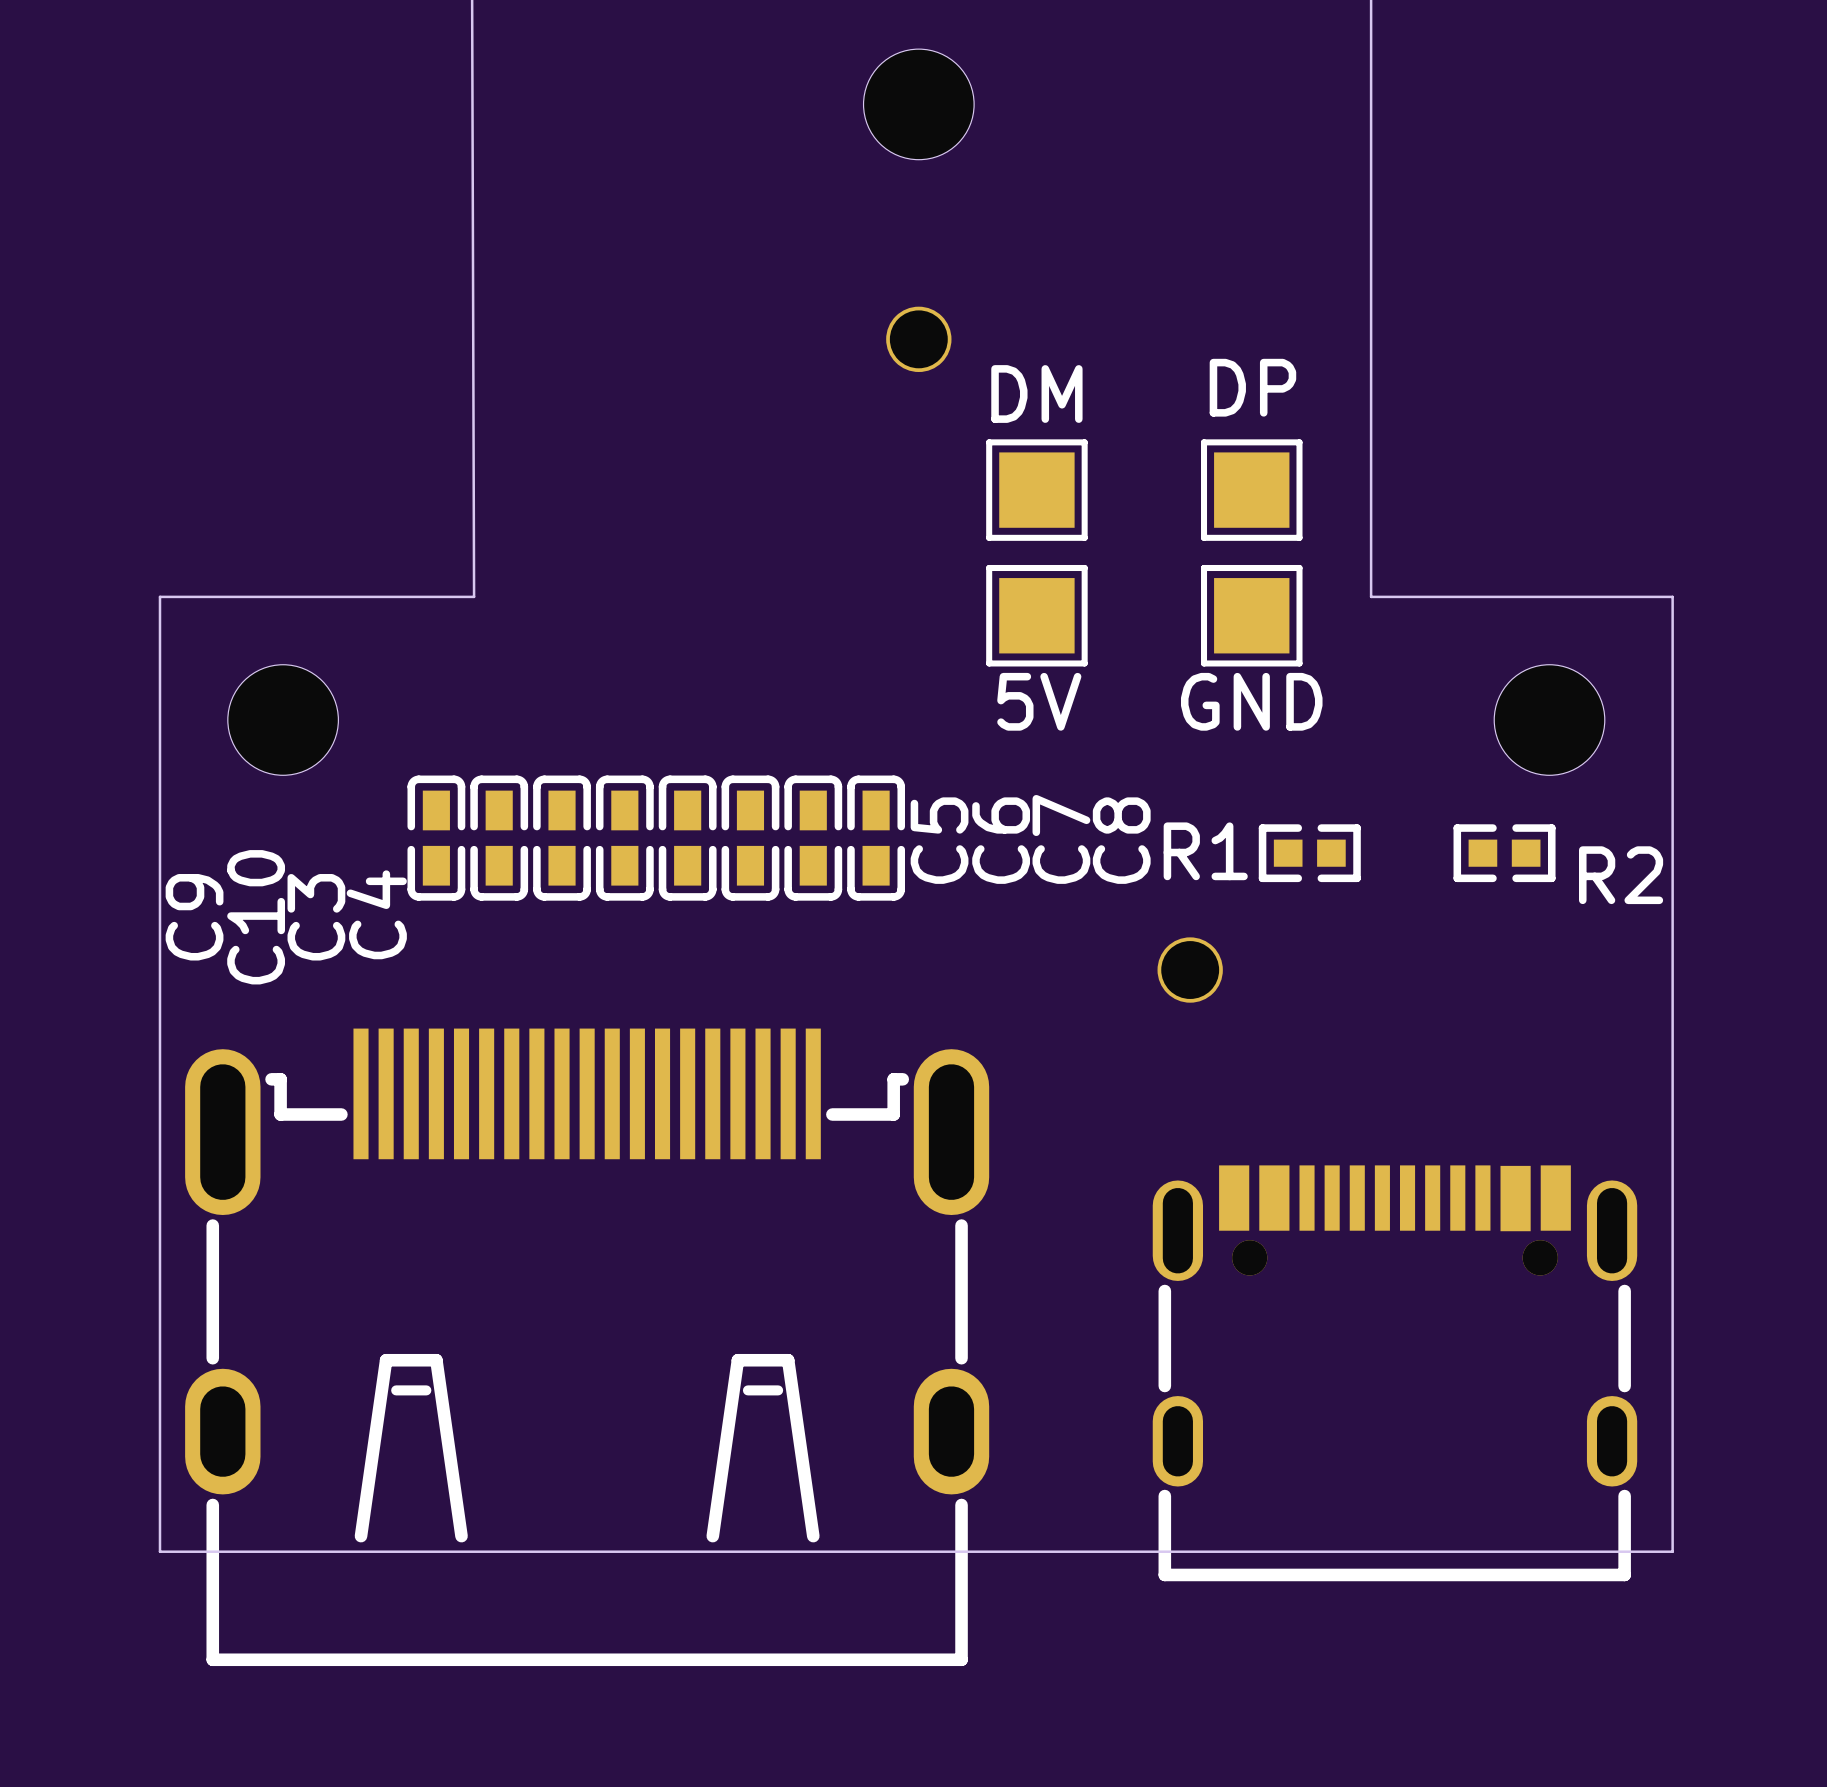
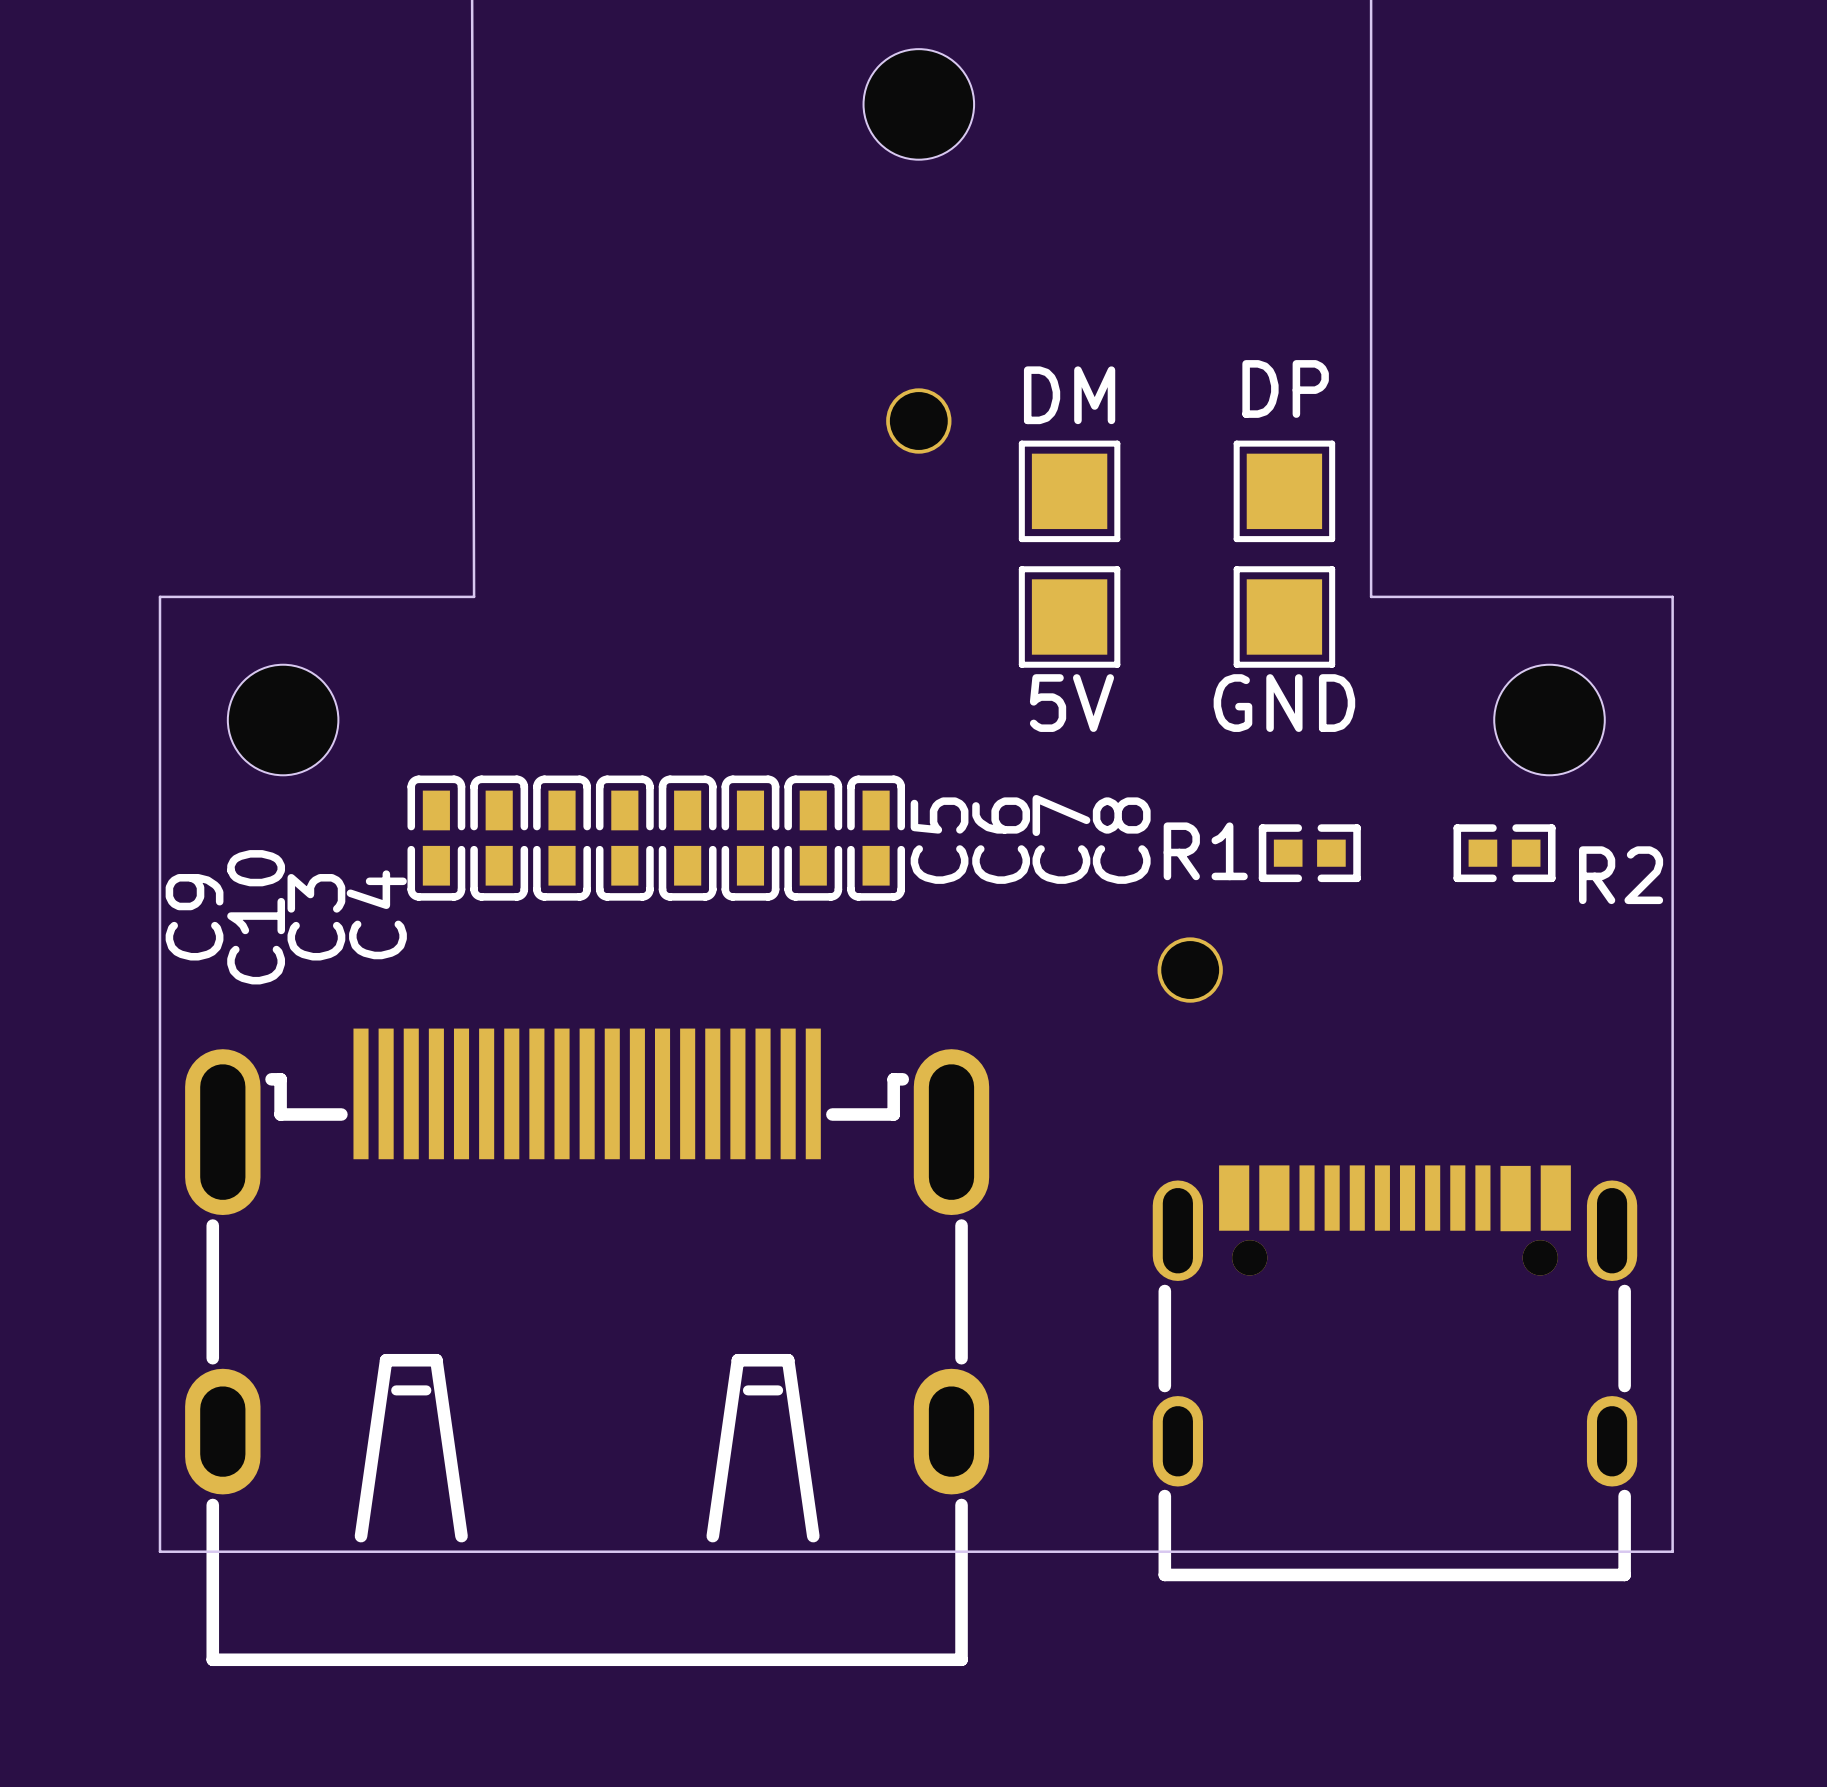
part position: (918, 339) -> (918, 421)
part position: (1036, 490) -> (1069, 491)
part position: (1251, 490) -> (1284, 491)
part position: (1036, 615) -> (1069, 616)
part position: (1251, 615) -> (1284, 616)

